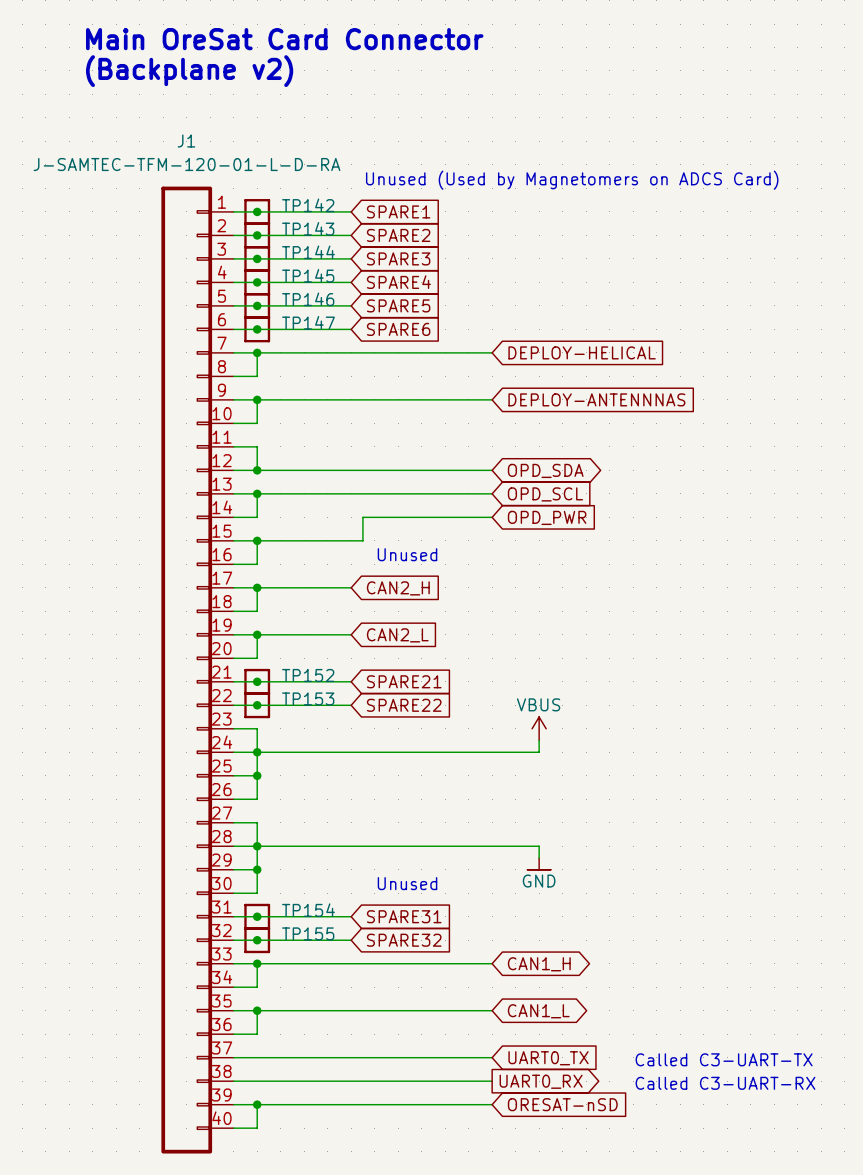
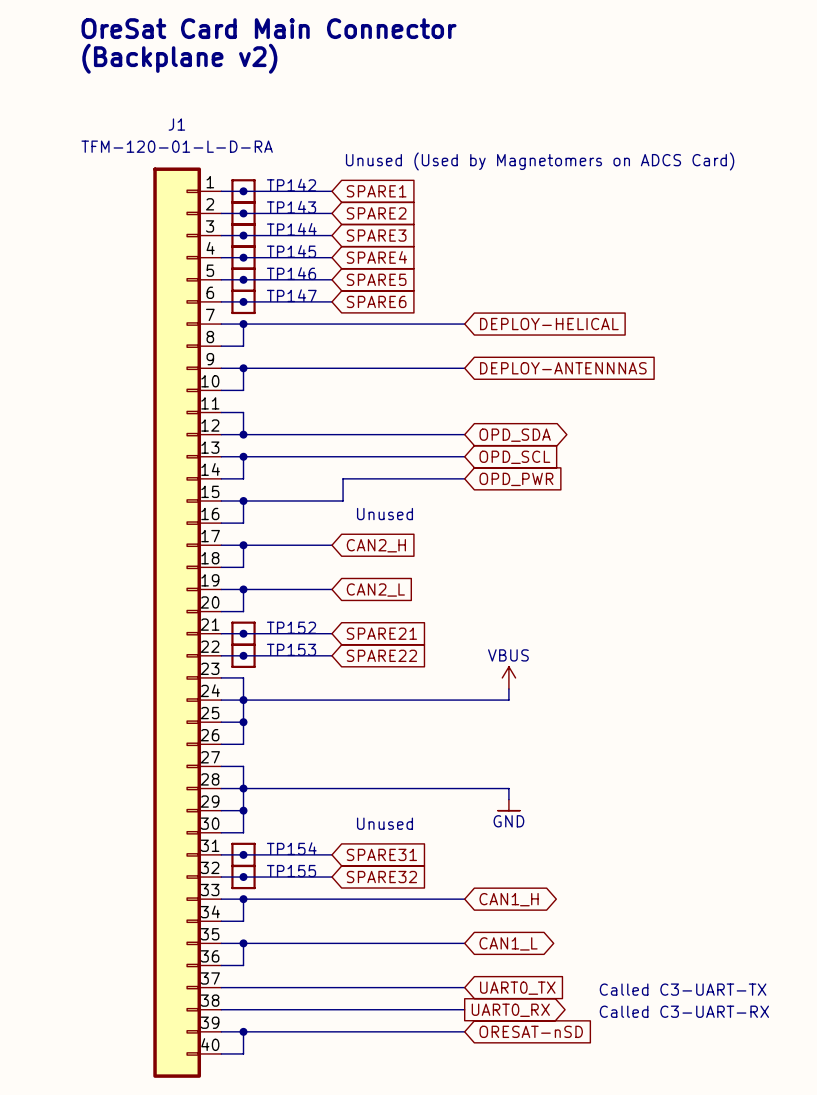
text: Main OreSat Card Connector (284, 39) -> OreSat Card Main Connector (268, 28)
J1 value: J-SAMTEC-TFM-120-01-L-D-RA (187, 164) -> TFM-120-01-L-D-RA (177, 146)
J1 symbol: [161, 186, 234, 1154] -> [153, 167, 222, 1078]

